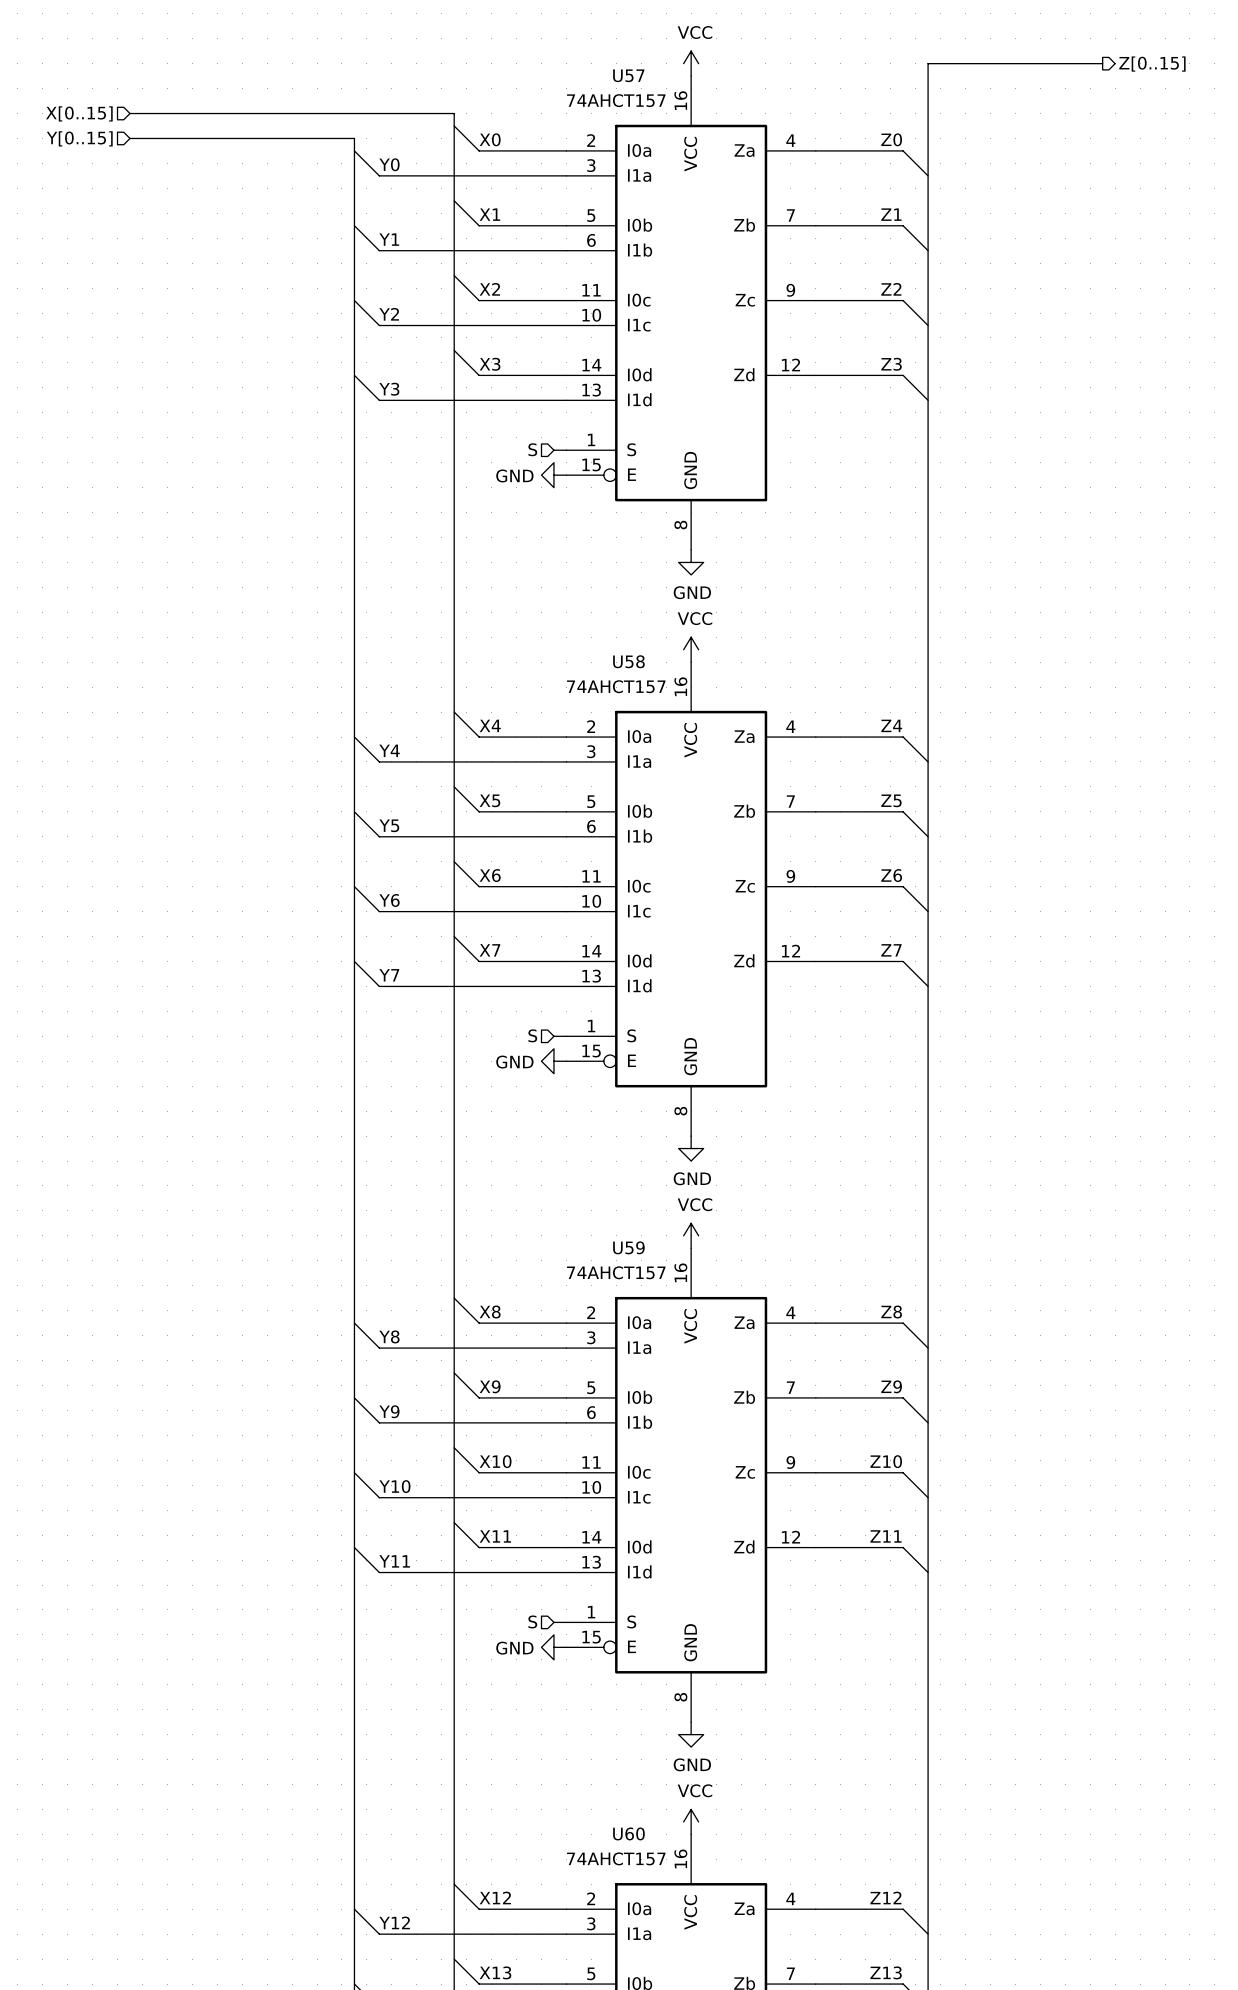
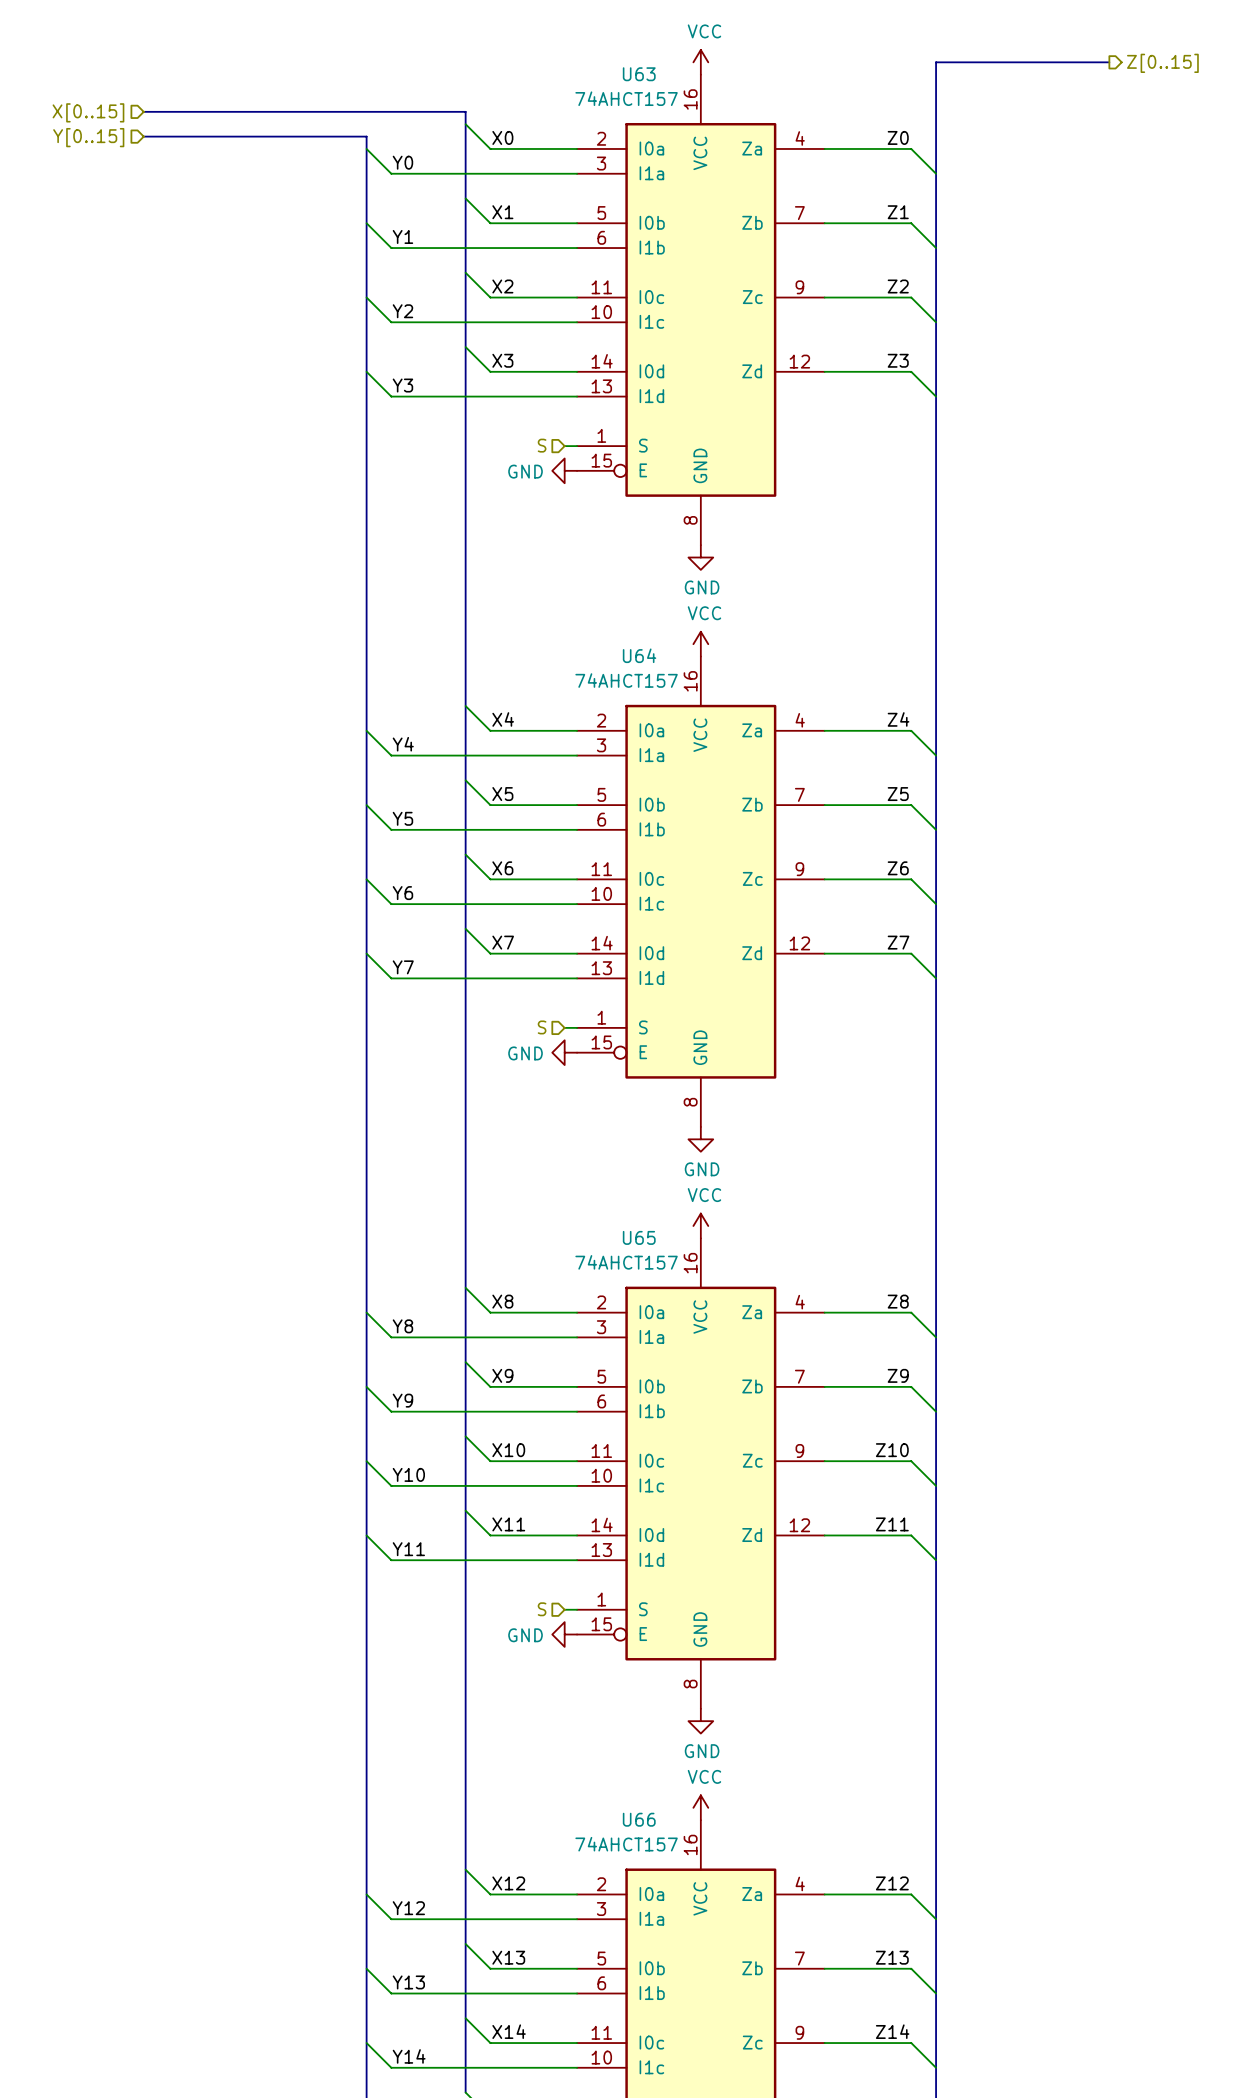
U57 name: U57 (628, 75) -> U63 (639, 74)
U58 name: U58 (628, 661) -> U64 (639, 655)
U59 name: U59 (628, 1247) -> U65 (639, 1237)
U60 name: U60 (628, 1833) -> U66 (639, 1819)

